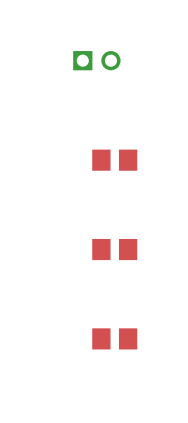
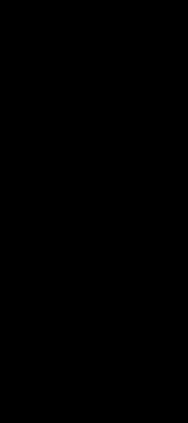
part: (96, 60) -> none
part: (114, 160) -> none
part: (114, 249) -> none
part: (114, 338) -> none

